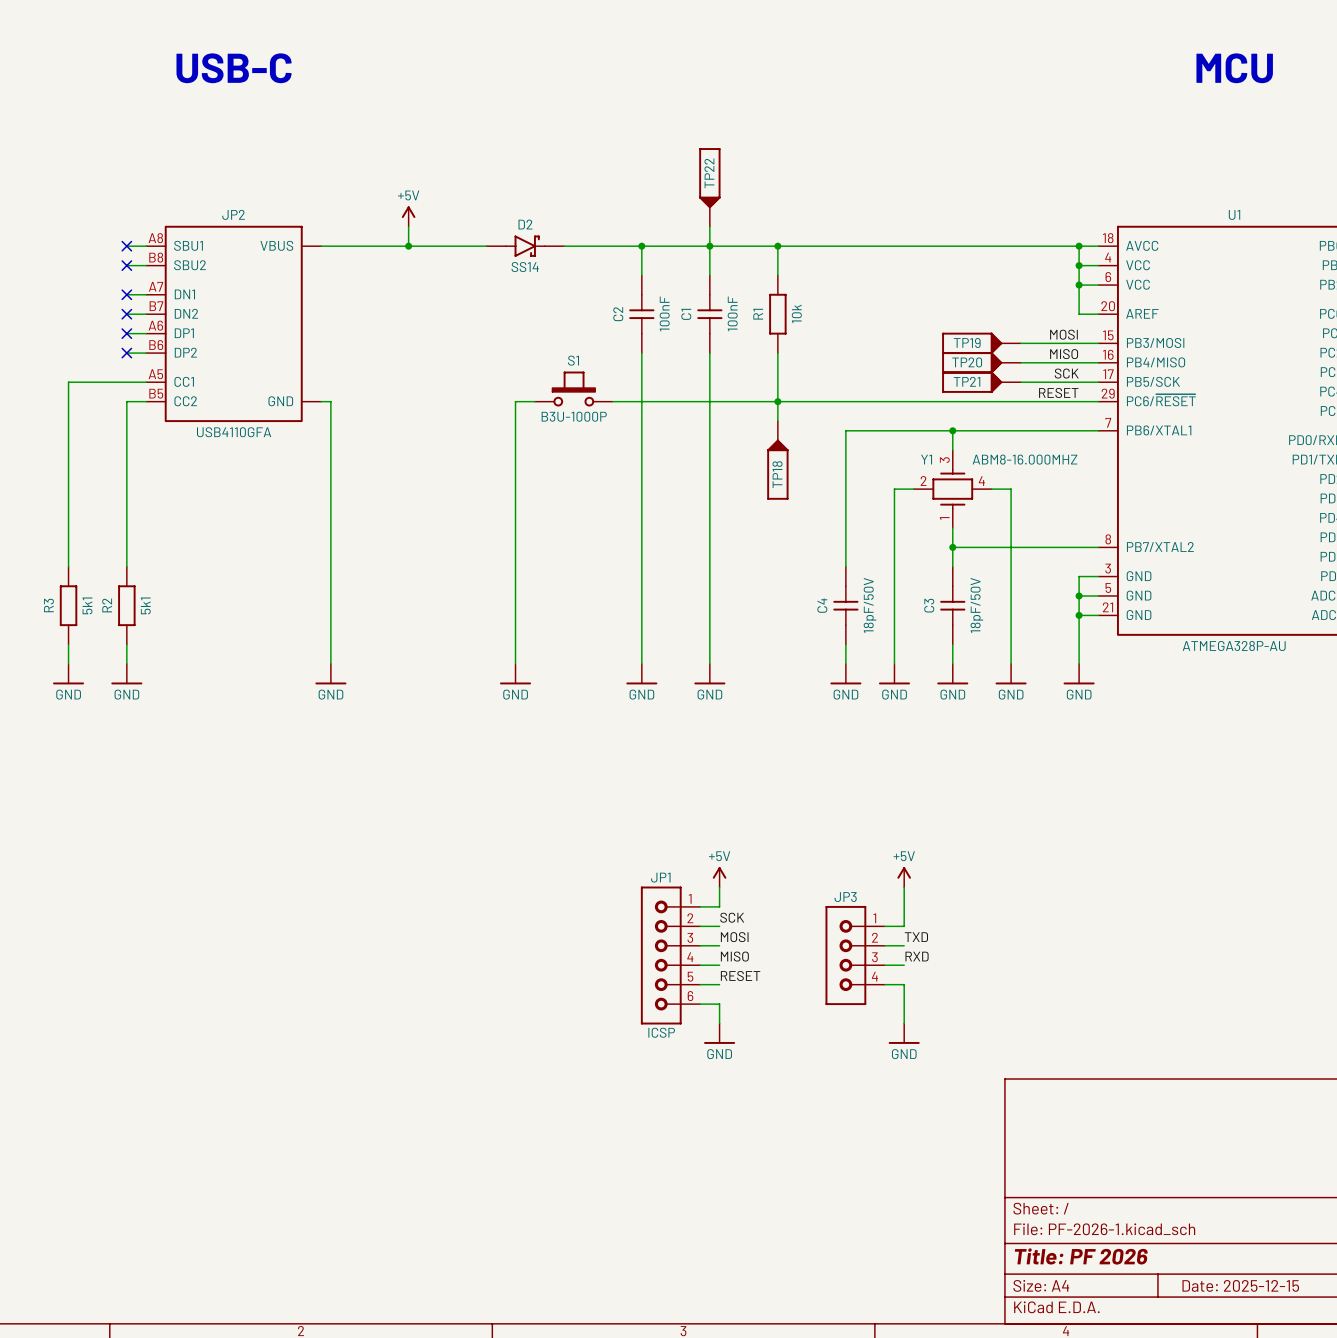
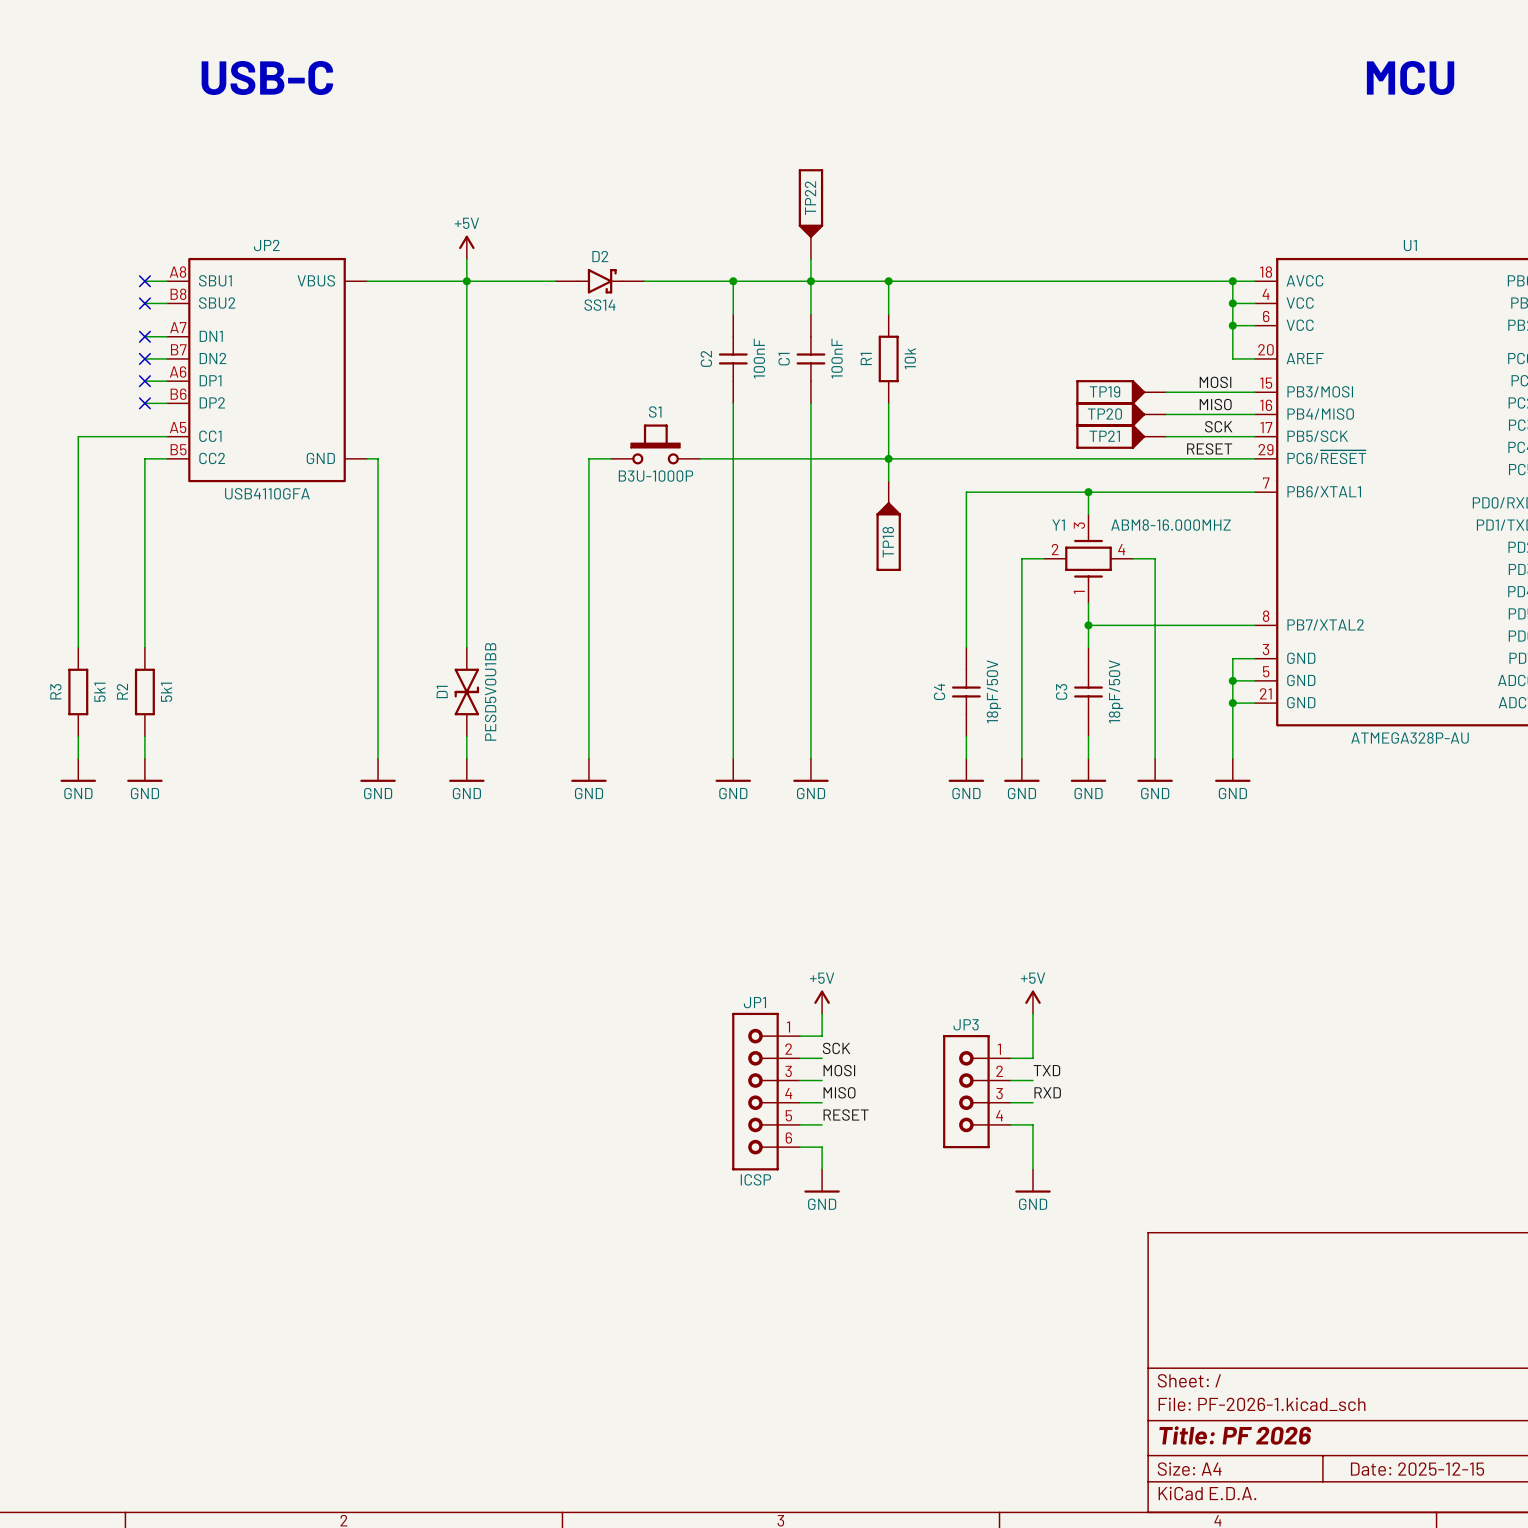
wire: none -> (466, 281) (466, 647)
D1: none -> PESD5V0U1BB (466, 691)
wire: none -> (466, 736) (466, 758)
power symbol: none -> GND (466, 770)

